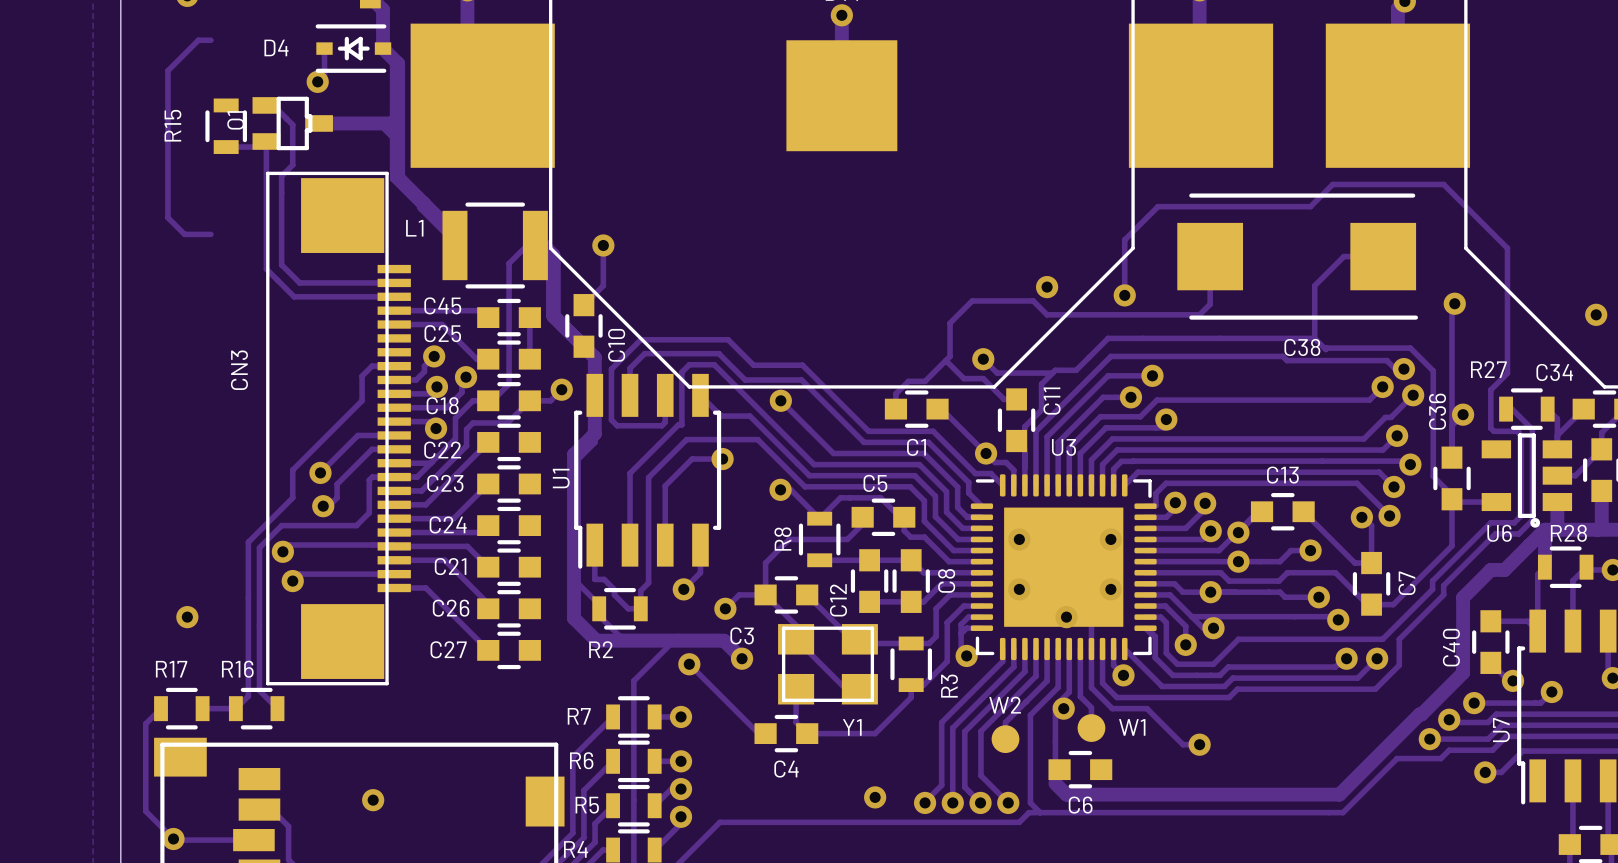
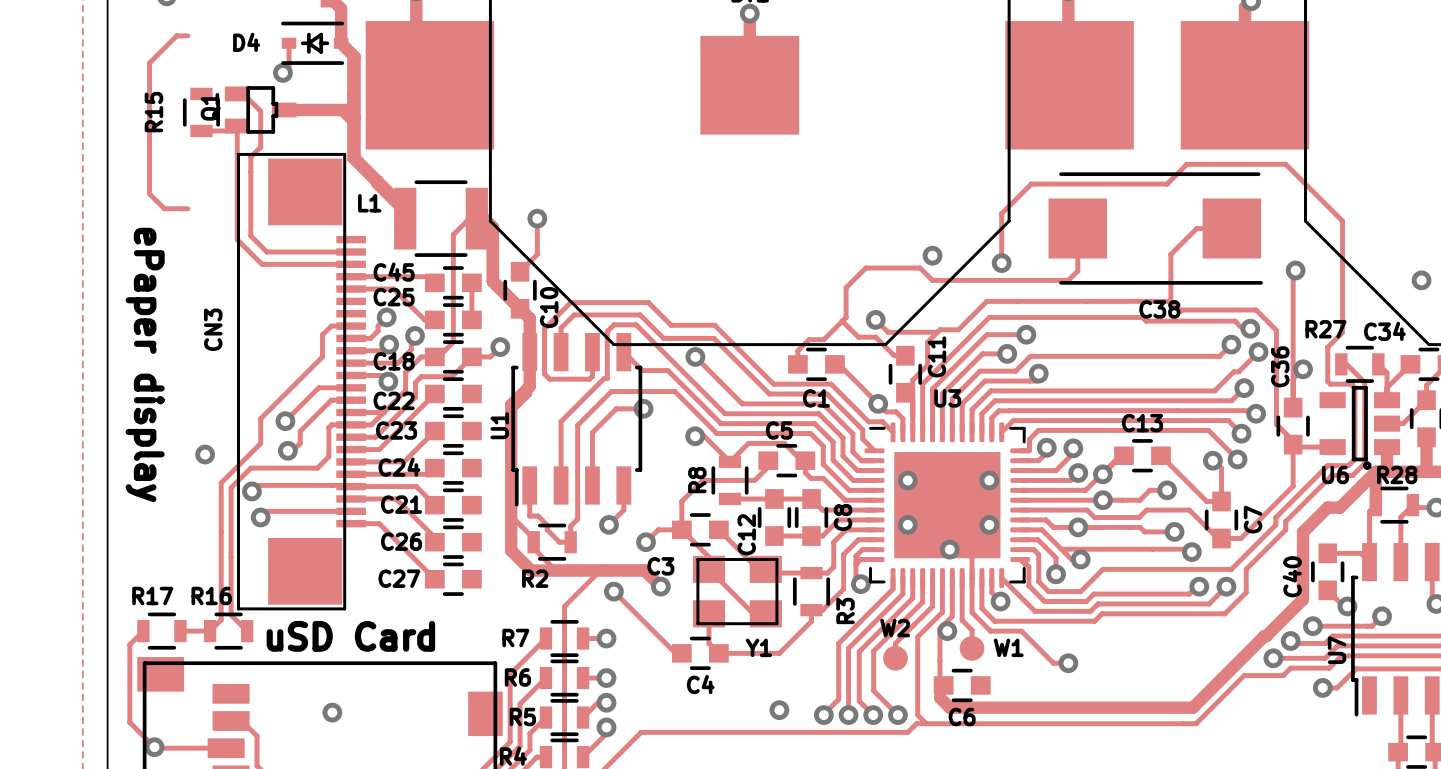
text: none -> ePaper display (145, 364)
via position: (187, 617) -> (205, 454)
text: none -> uSD Card (350, 636)

